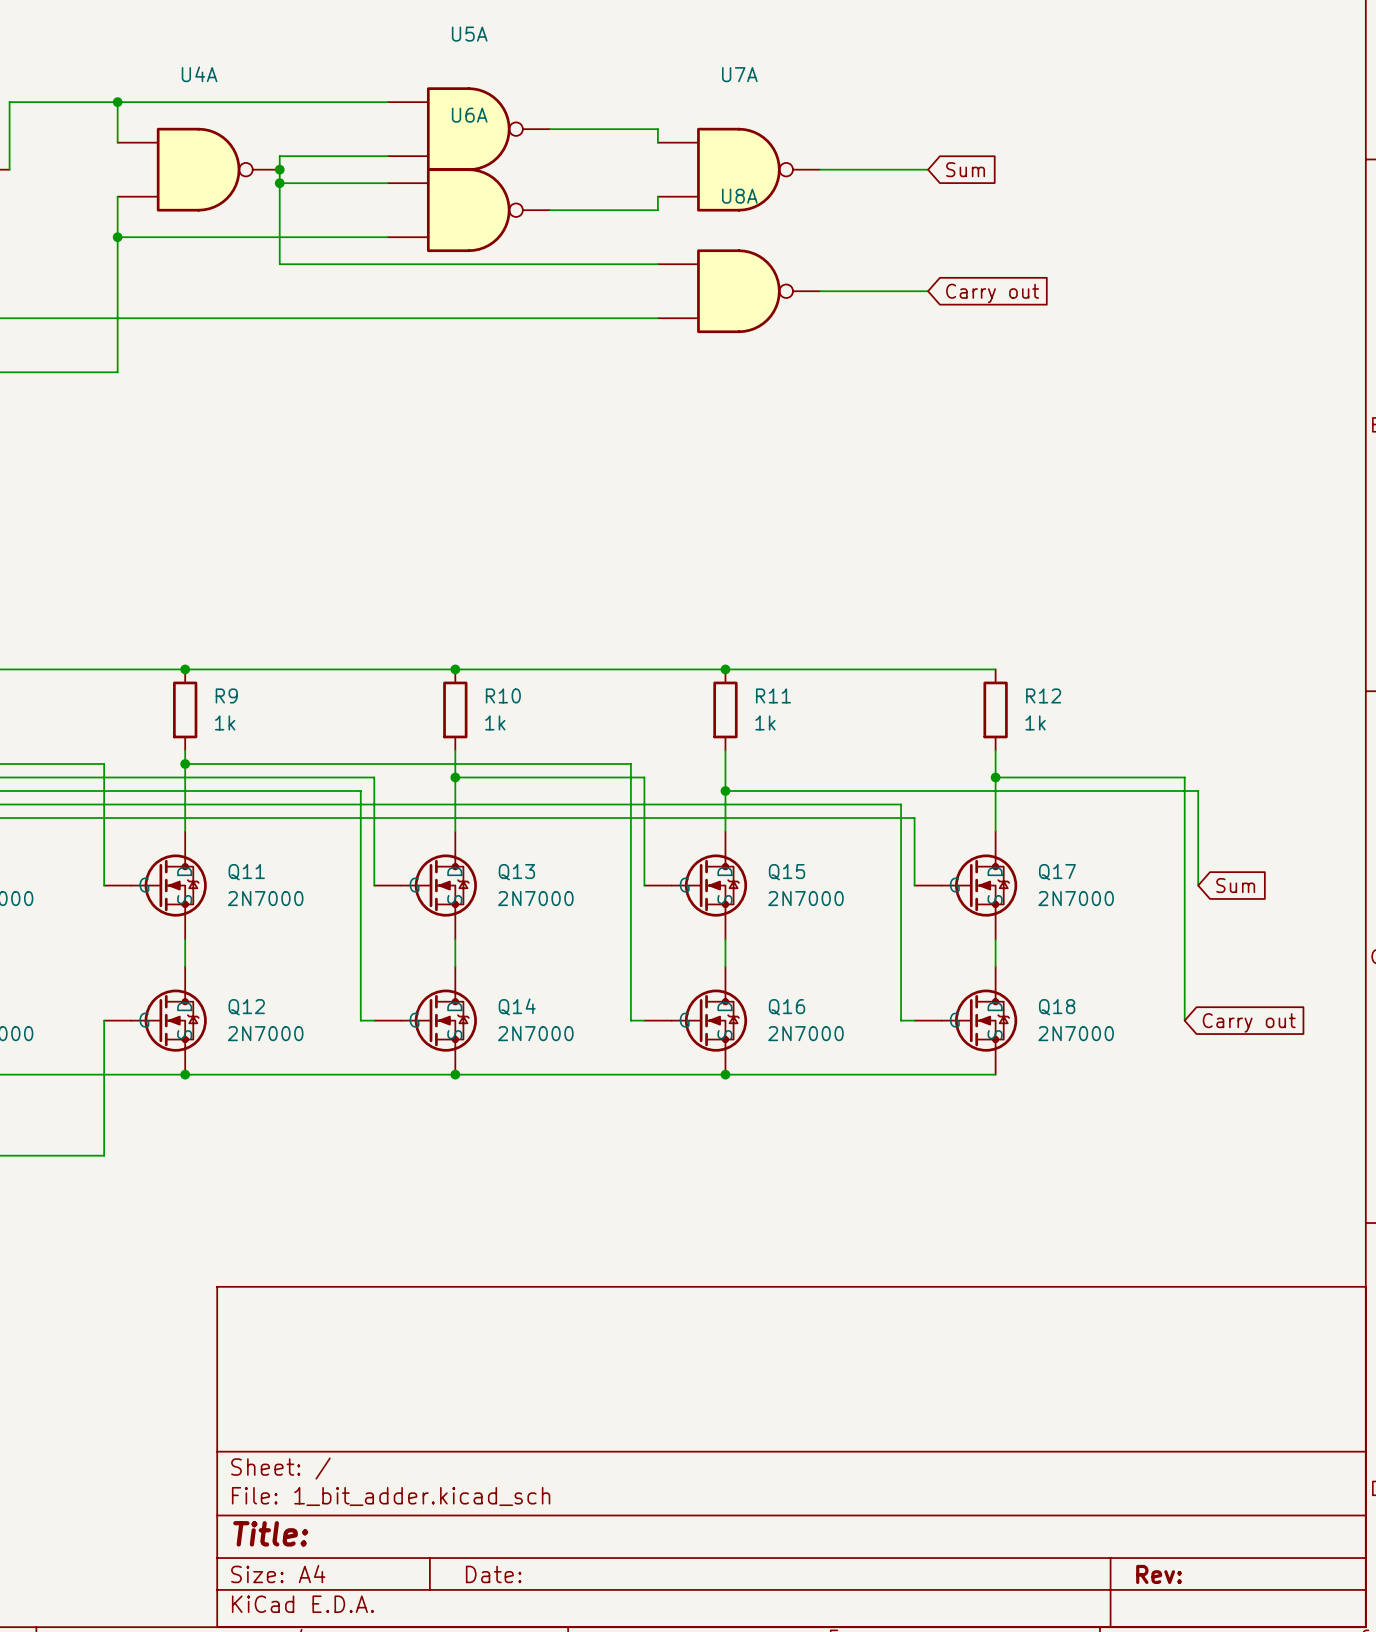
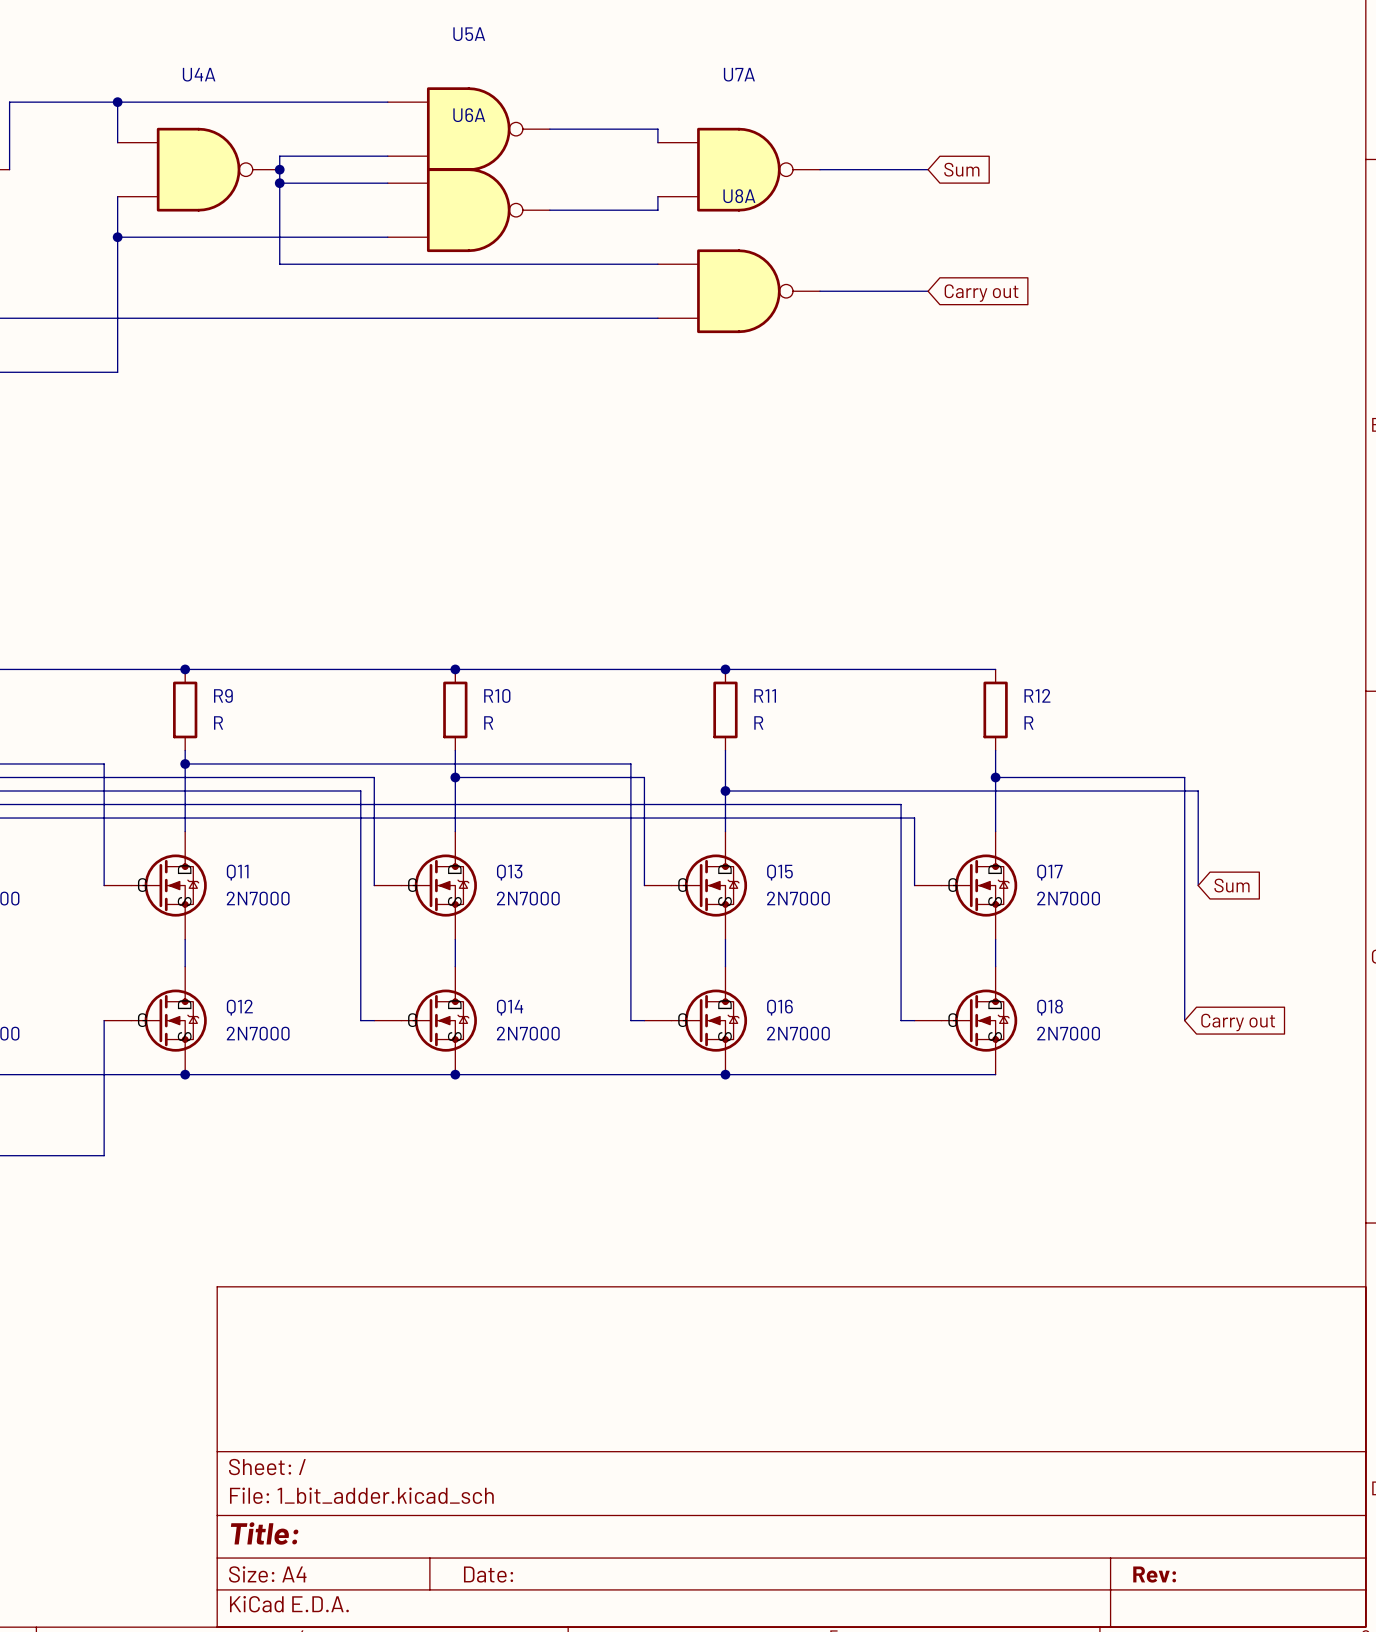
R9 value: 1k (225, 722) -> R (218, 722)
R10 value: 1k (495, 722) -> R (488, 722)
R11 value: 1k (765, 722) -> R (758, 722)
R12 value: 1k (1035, 722) -> R (1028, 722)

